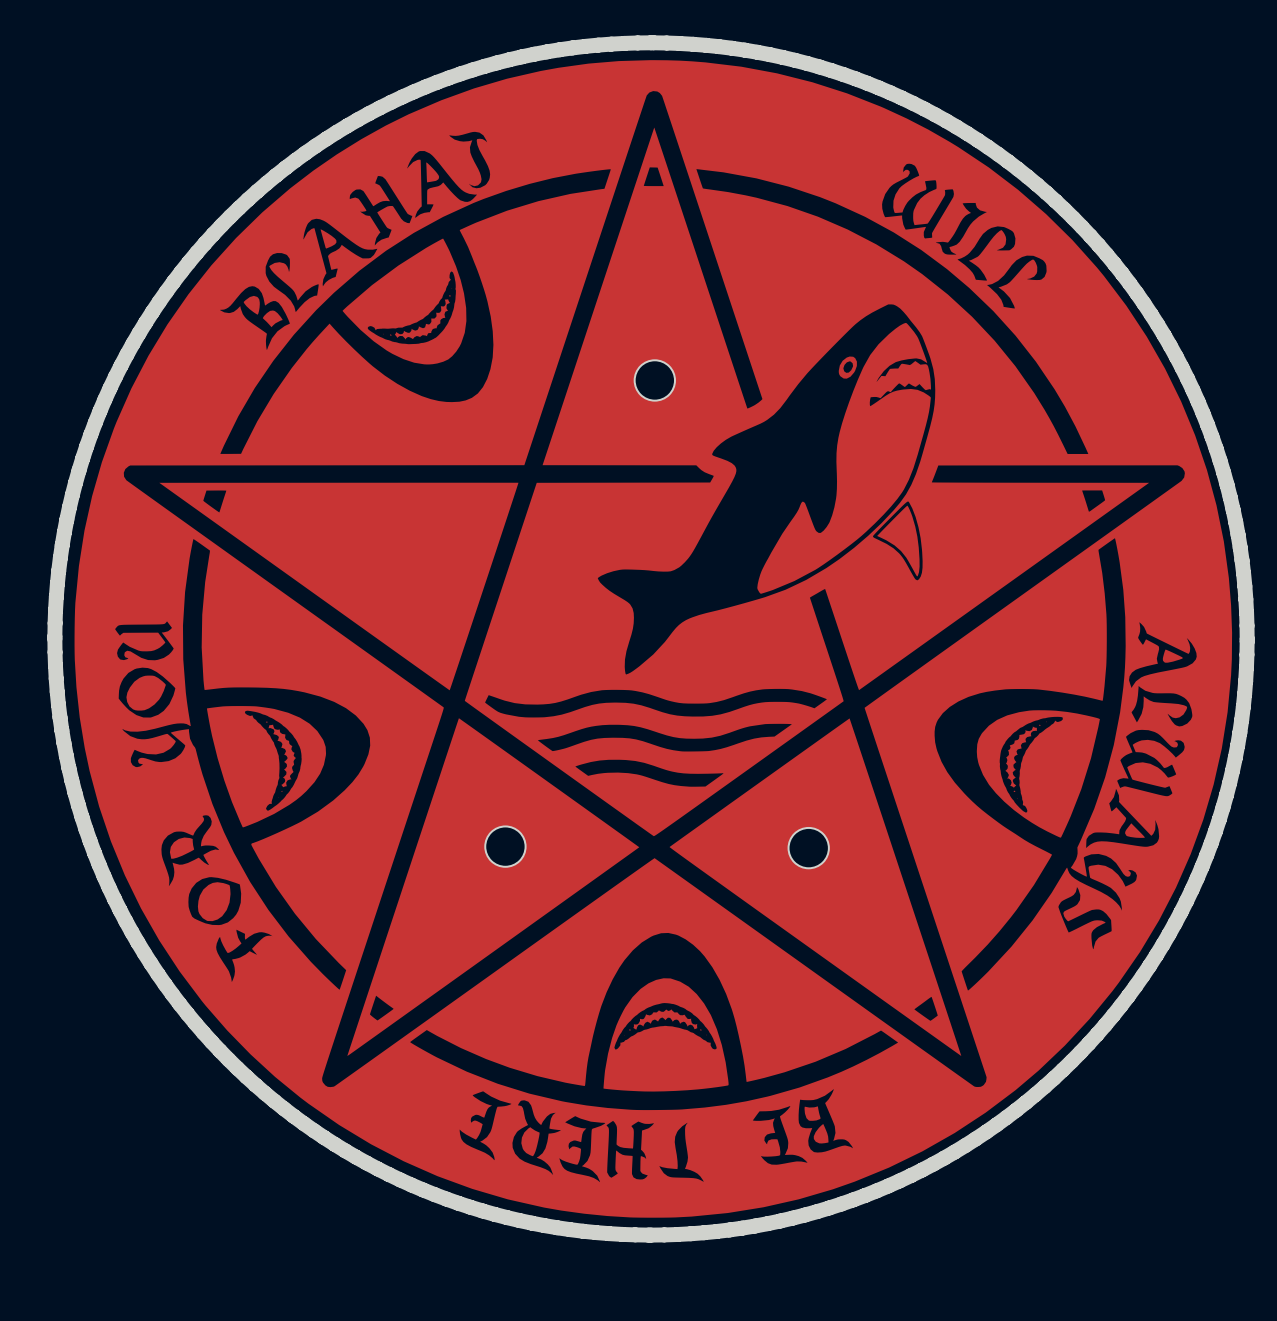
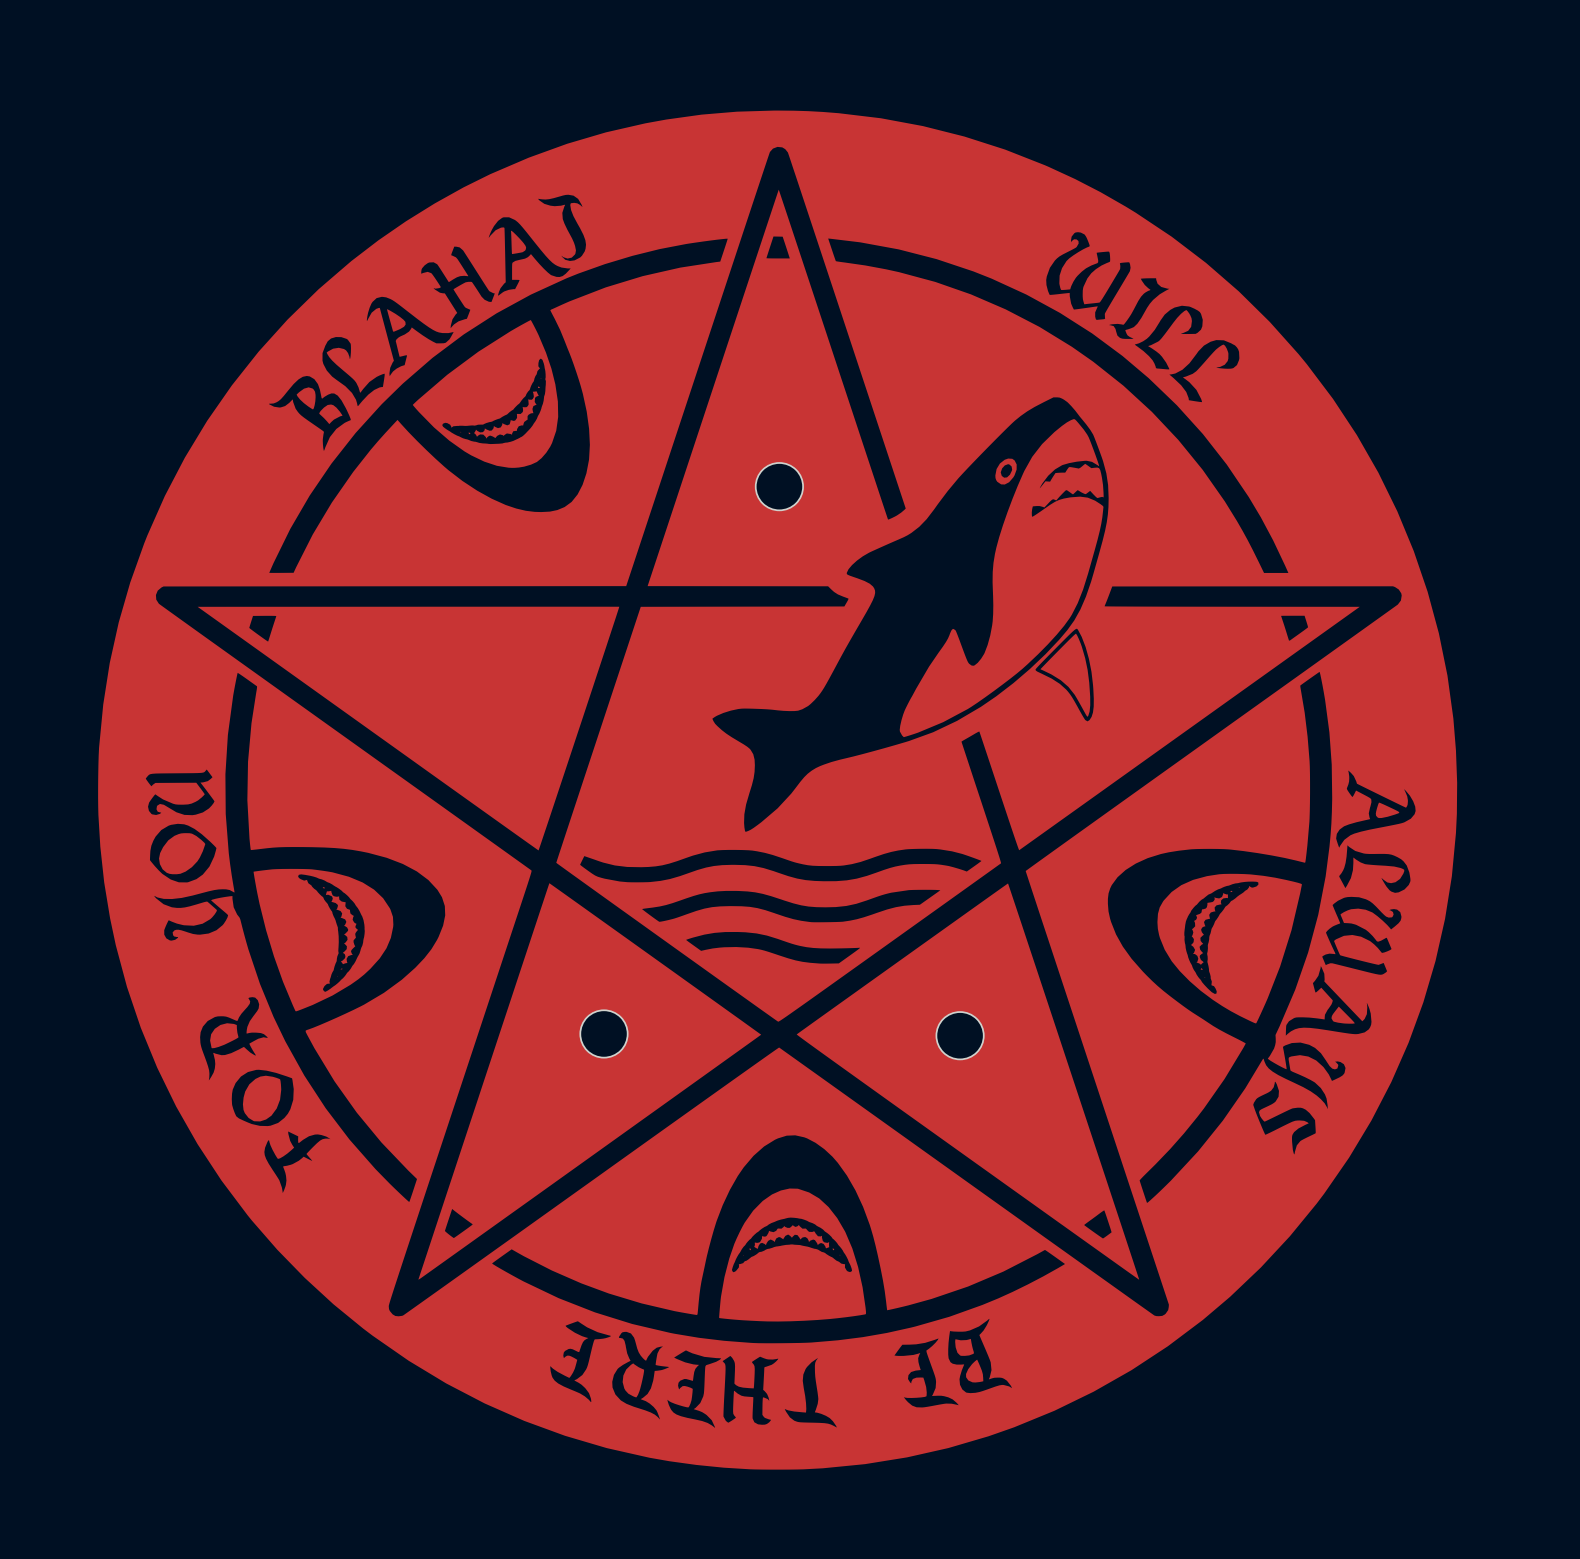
board edge: (651, 42) (706, 45) (770, 54) (819, 66) (878, 87) (924, 108) (977, 140) (1027, 176) (1073, 218) (1114, 264) (1150, 314) (1176, 356) (1202, 413) (1223, 472) (1235, 522) (1244, 586) (1247, 641) (1244, 694) (1235, 757) (1223, 807) (1202, 866) (1181, 912) (1149, 965) (1113, 1015) (1071, 1061) (1025, 1102) (975, 1138) (933, 1164) (876, 1190) (817, 1211) (767, 1223) (703, 1232) (648, 1235) (595, 1232) (531, 1223) (482, 1210) (423, 1189) (377, 1168) (324, 1137) (274, 1101) (228, 1059) (187, 1013) (151, 963) (125, 921) (99, 864) (78, 805) (66, 755) (57, 691) (54, 636) (57, 583) (66, 519) (79, 470) (99, 411) (121, 365) (152, 312) (188, 262) (230, 216) (276, 175) (326, 139) (368, 113) (425, 87) (484, 66) (534, 54) (598, 45) (651, 42) -> none

